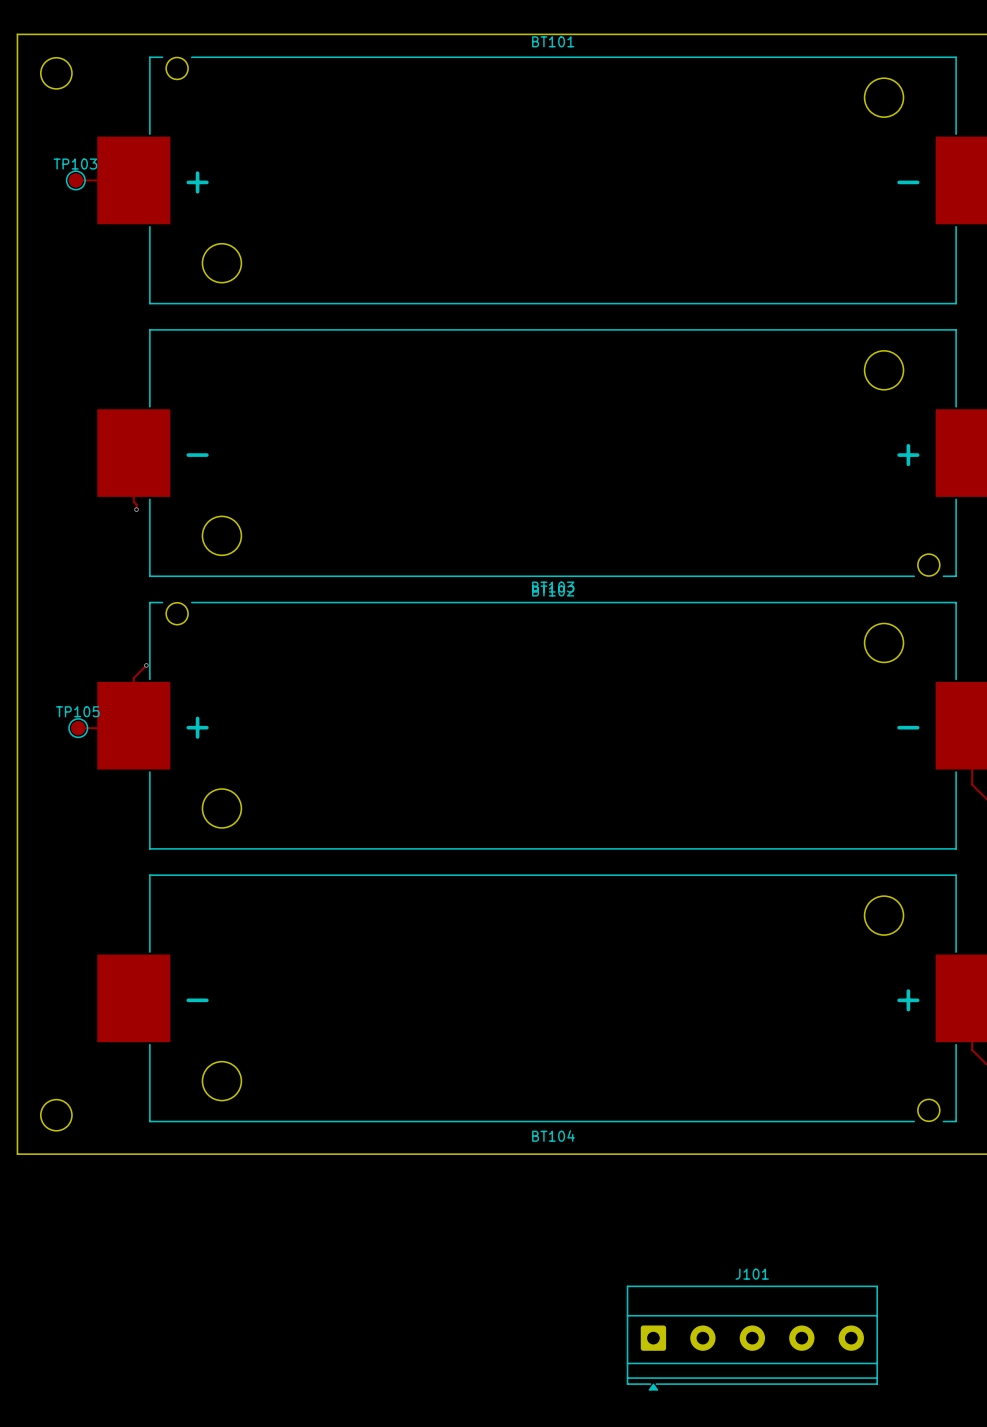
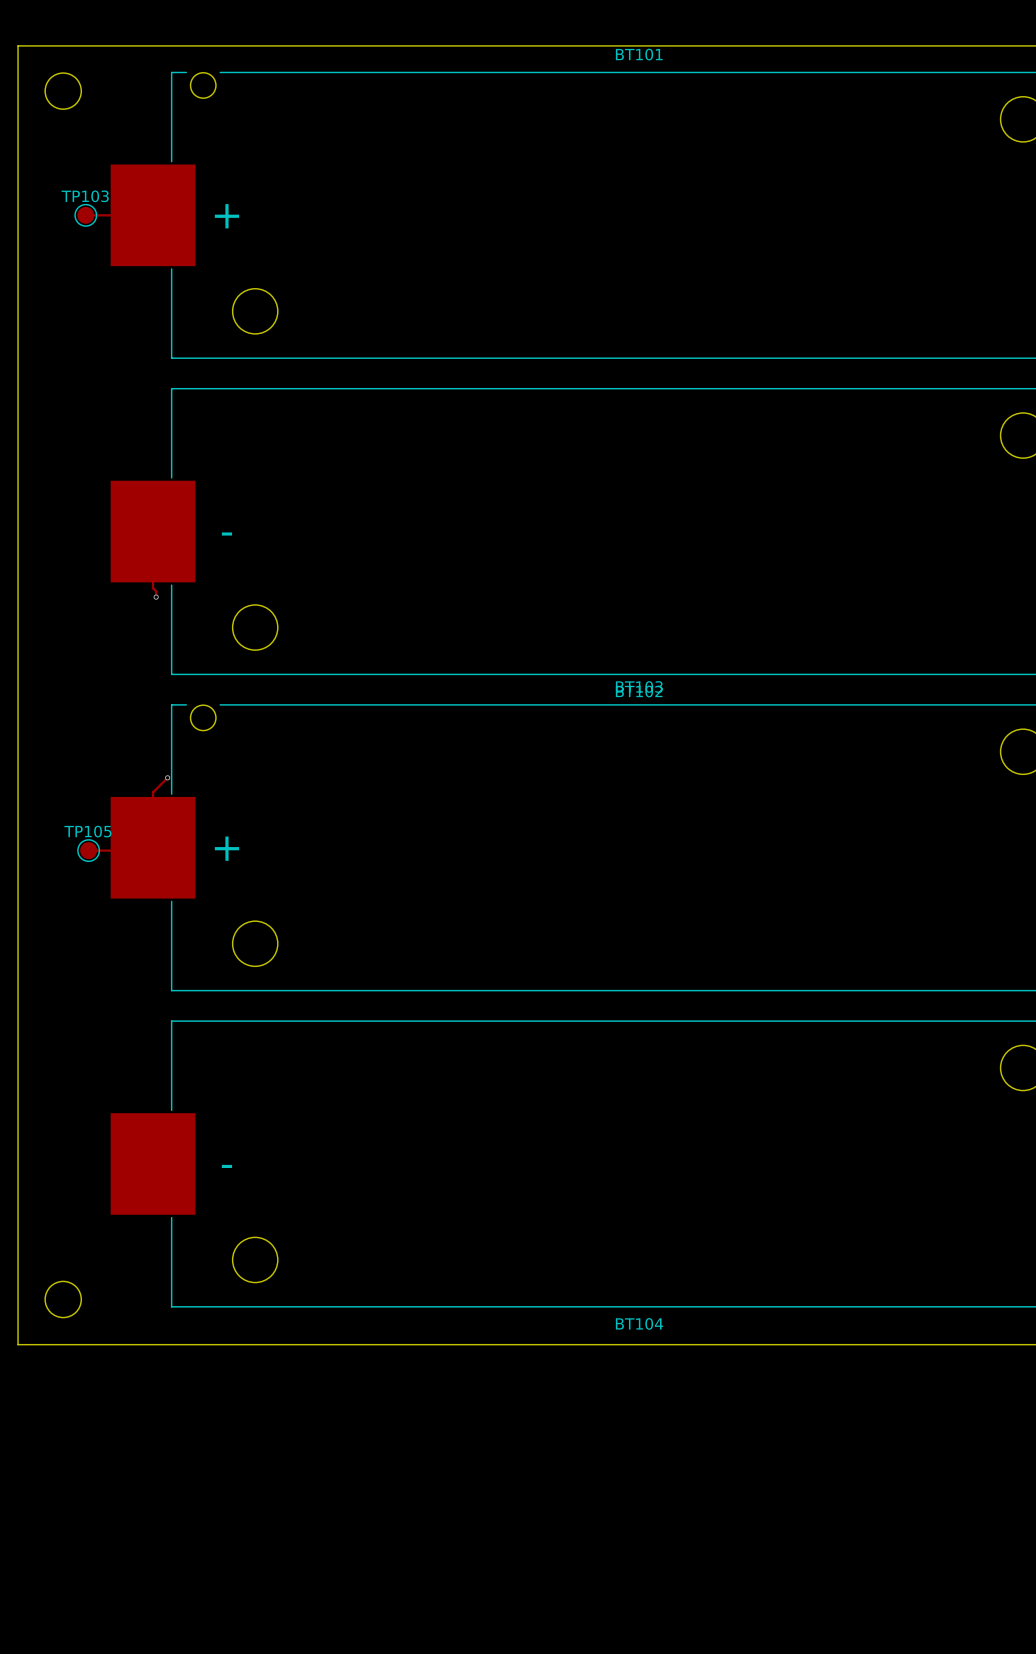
J101: (752, 1338) -> none

